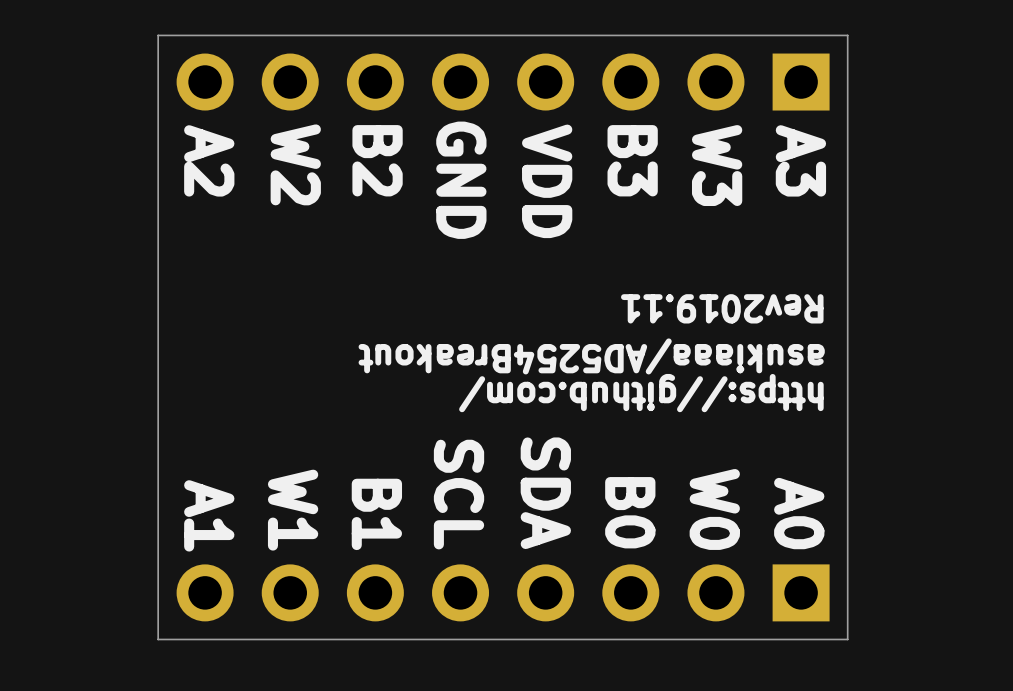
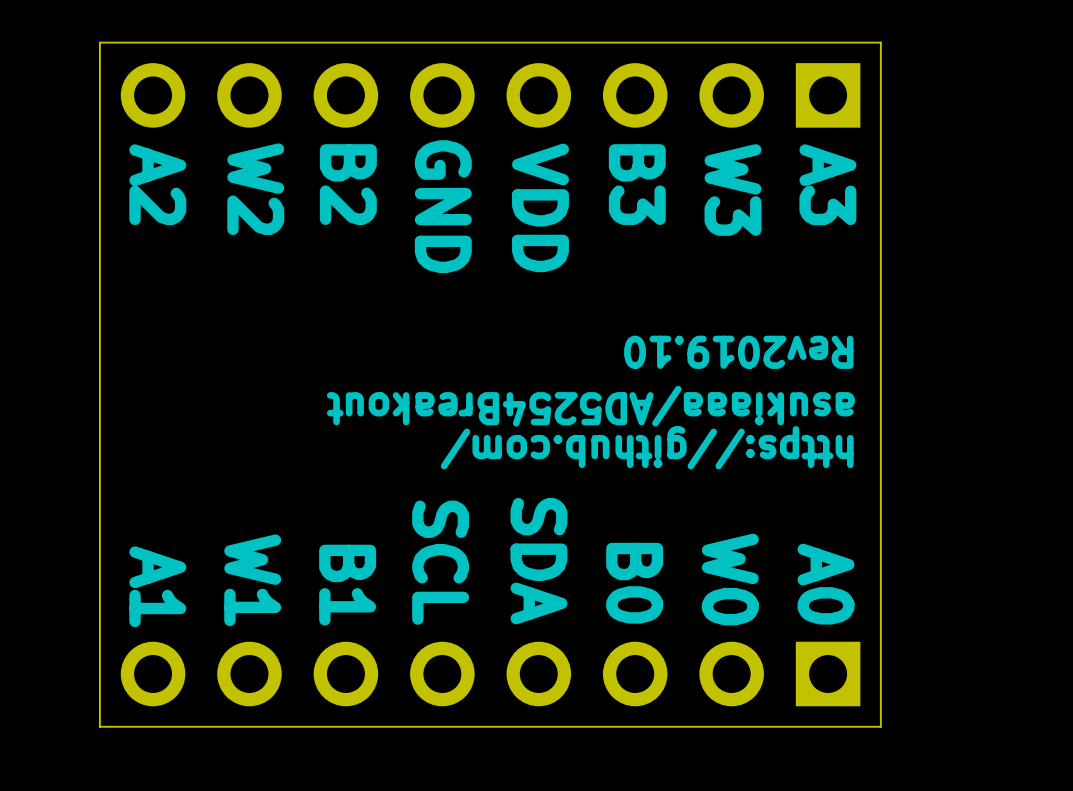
text: Rev2019.11 (722, 308) -> Rev2019.10 (738, 352)

